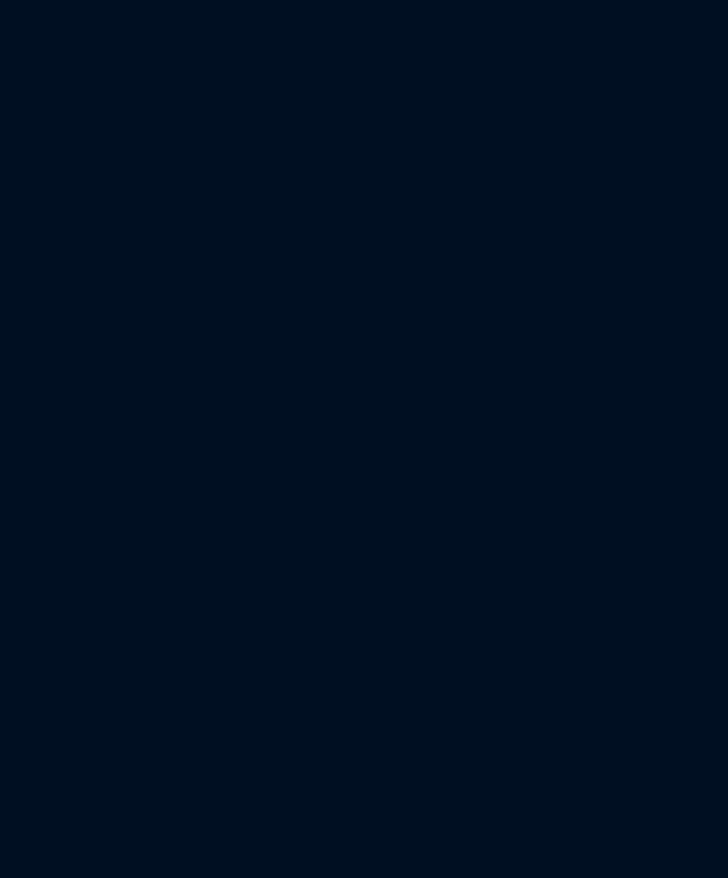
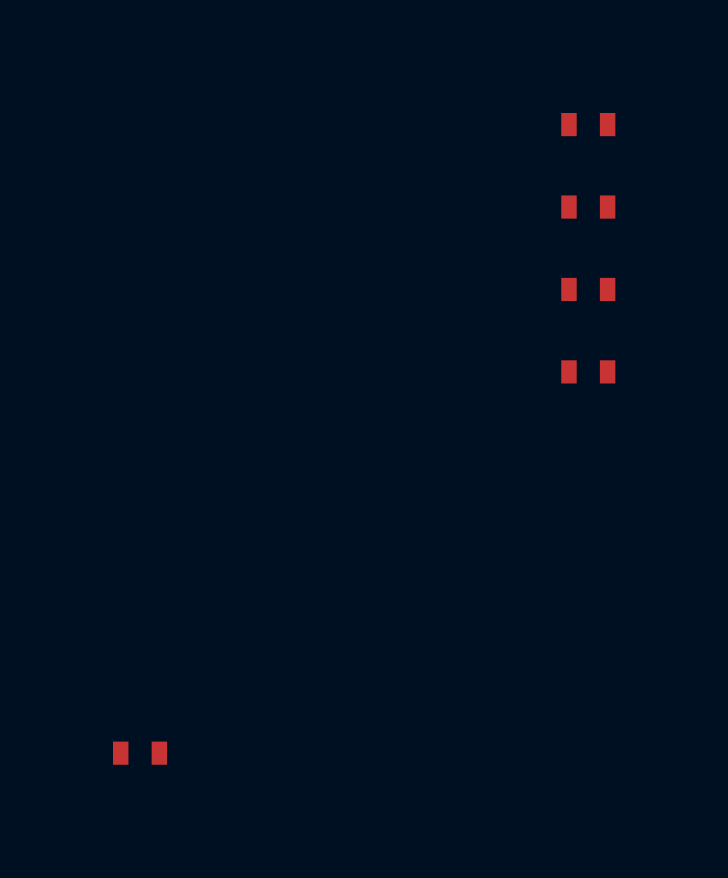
part: none -> (588, 124)
part: none -> (588, 207)
part: none -> (588, 289)
part: none -> (588, 371)
part: none -> (140, 753)

